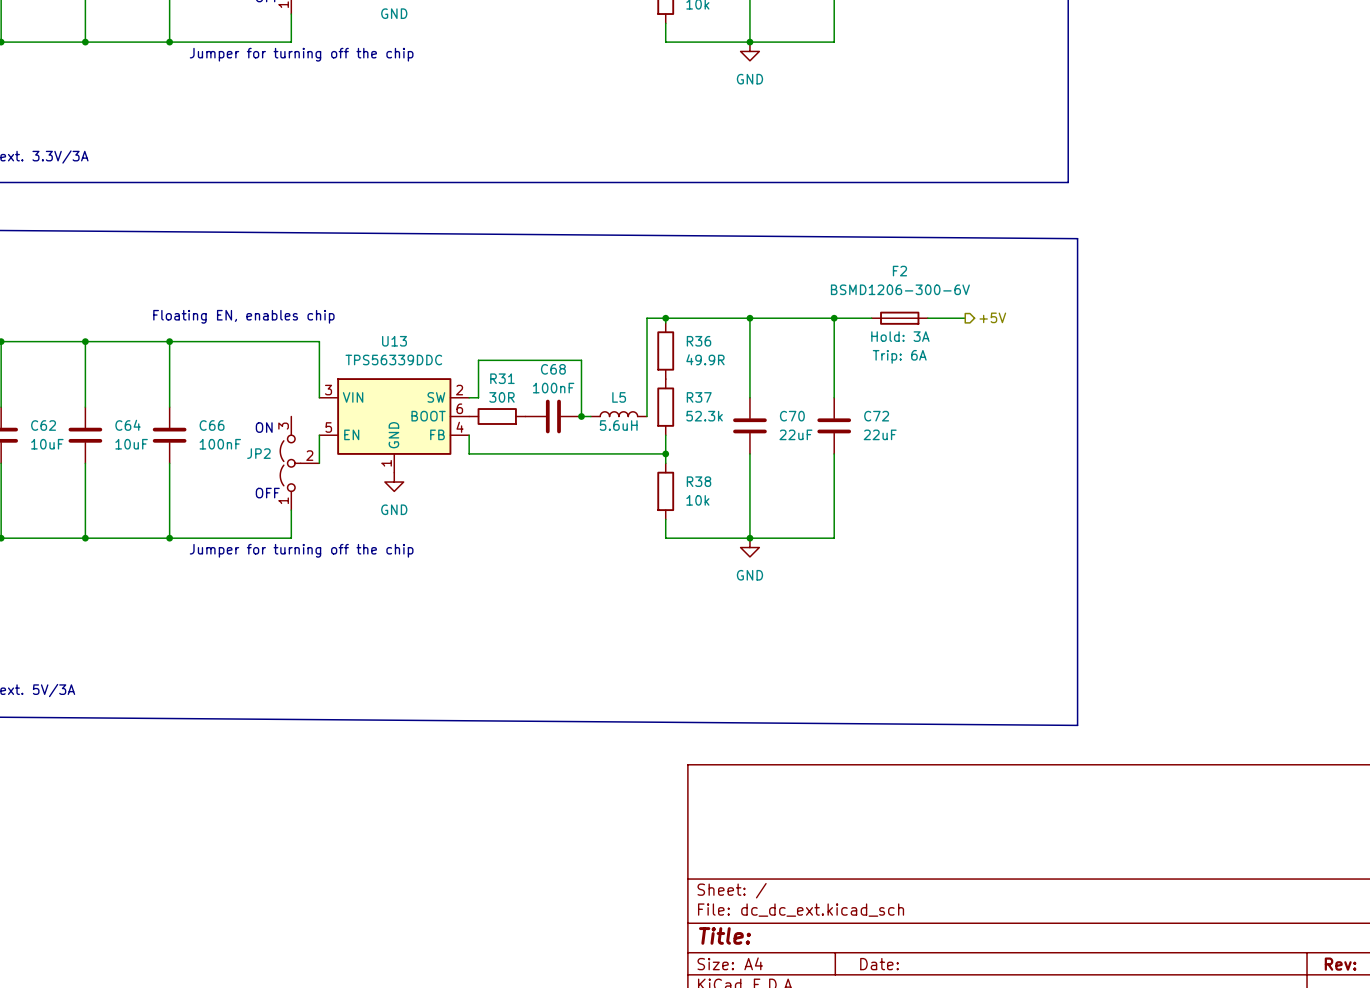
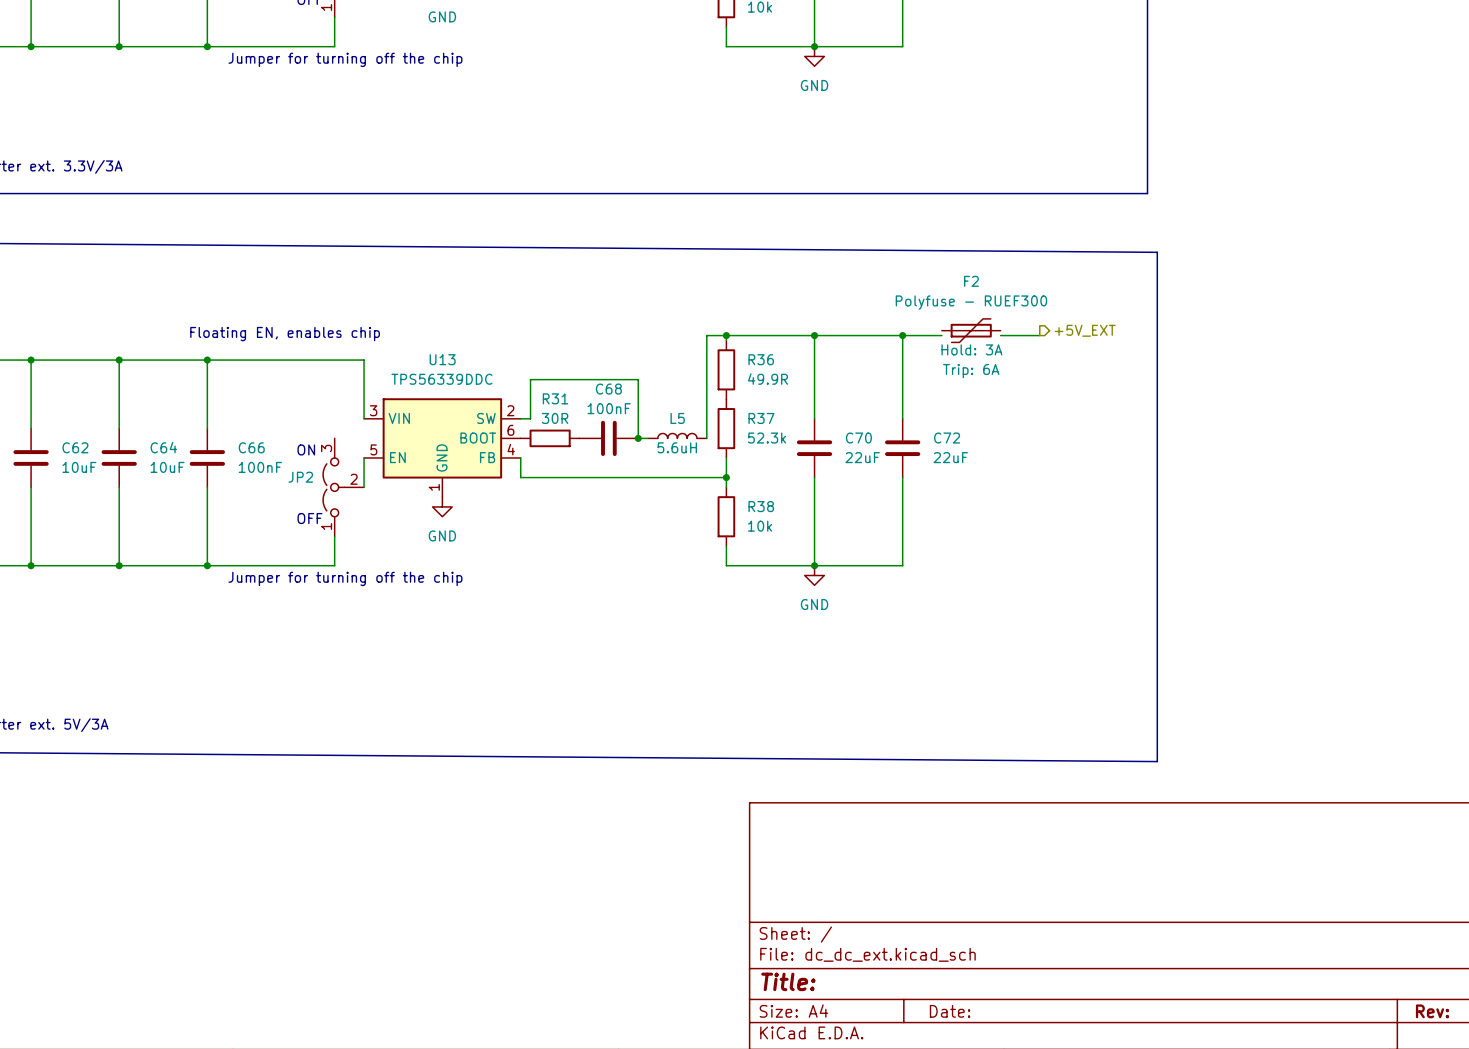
F2 value: BSMD1206-300-6V (900, 289) -> Polyfuse - RUEF300 (971, 302)
F2 symbol: [871, 311, 928, 325] -> [941, 318, 1001, 343]
hierarchical label: +5V (992, 317) -> +5V_EXT (1085, 330)
F2 text: none -> Hold: 3A (971, 349)
F2 text: Hold: 3A (900, 336) -> none
F2 text: none -> Trip: 6A (971, 371)
F2 text: Trip: 6A (899, 356) -> none

